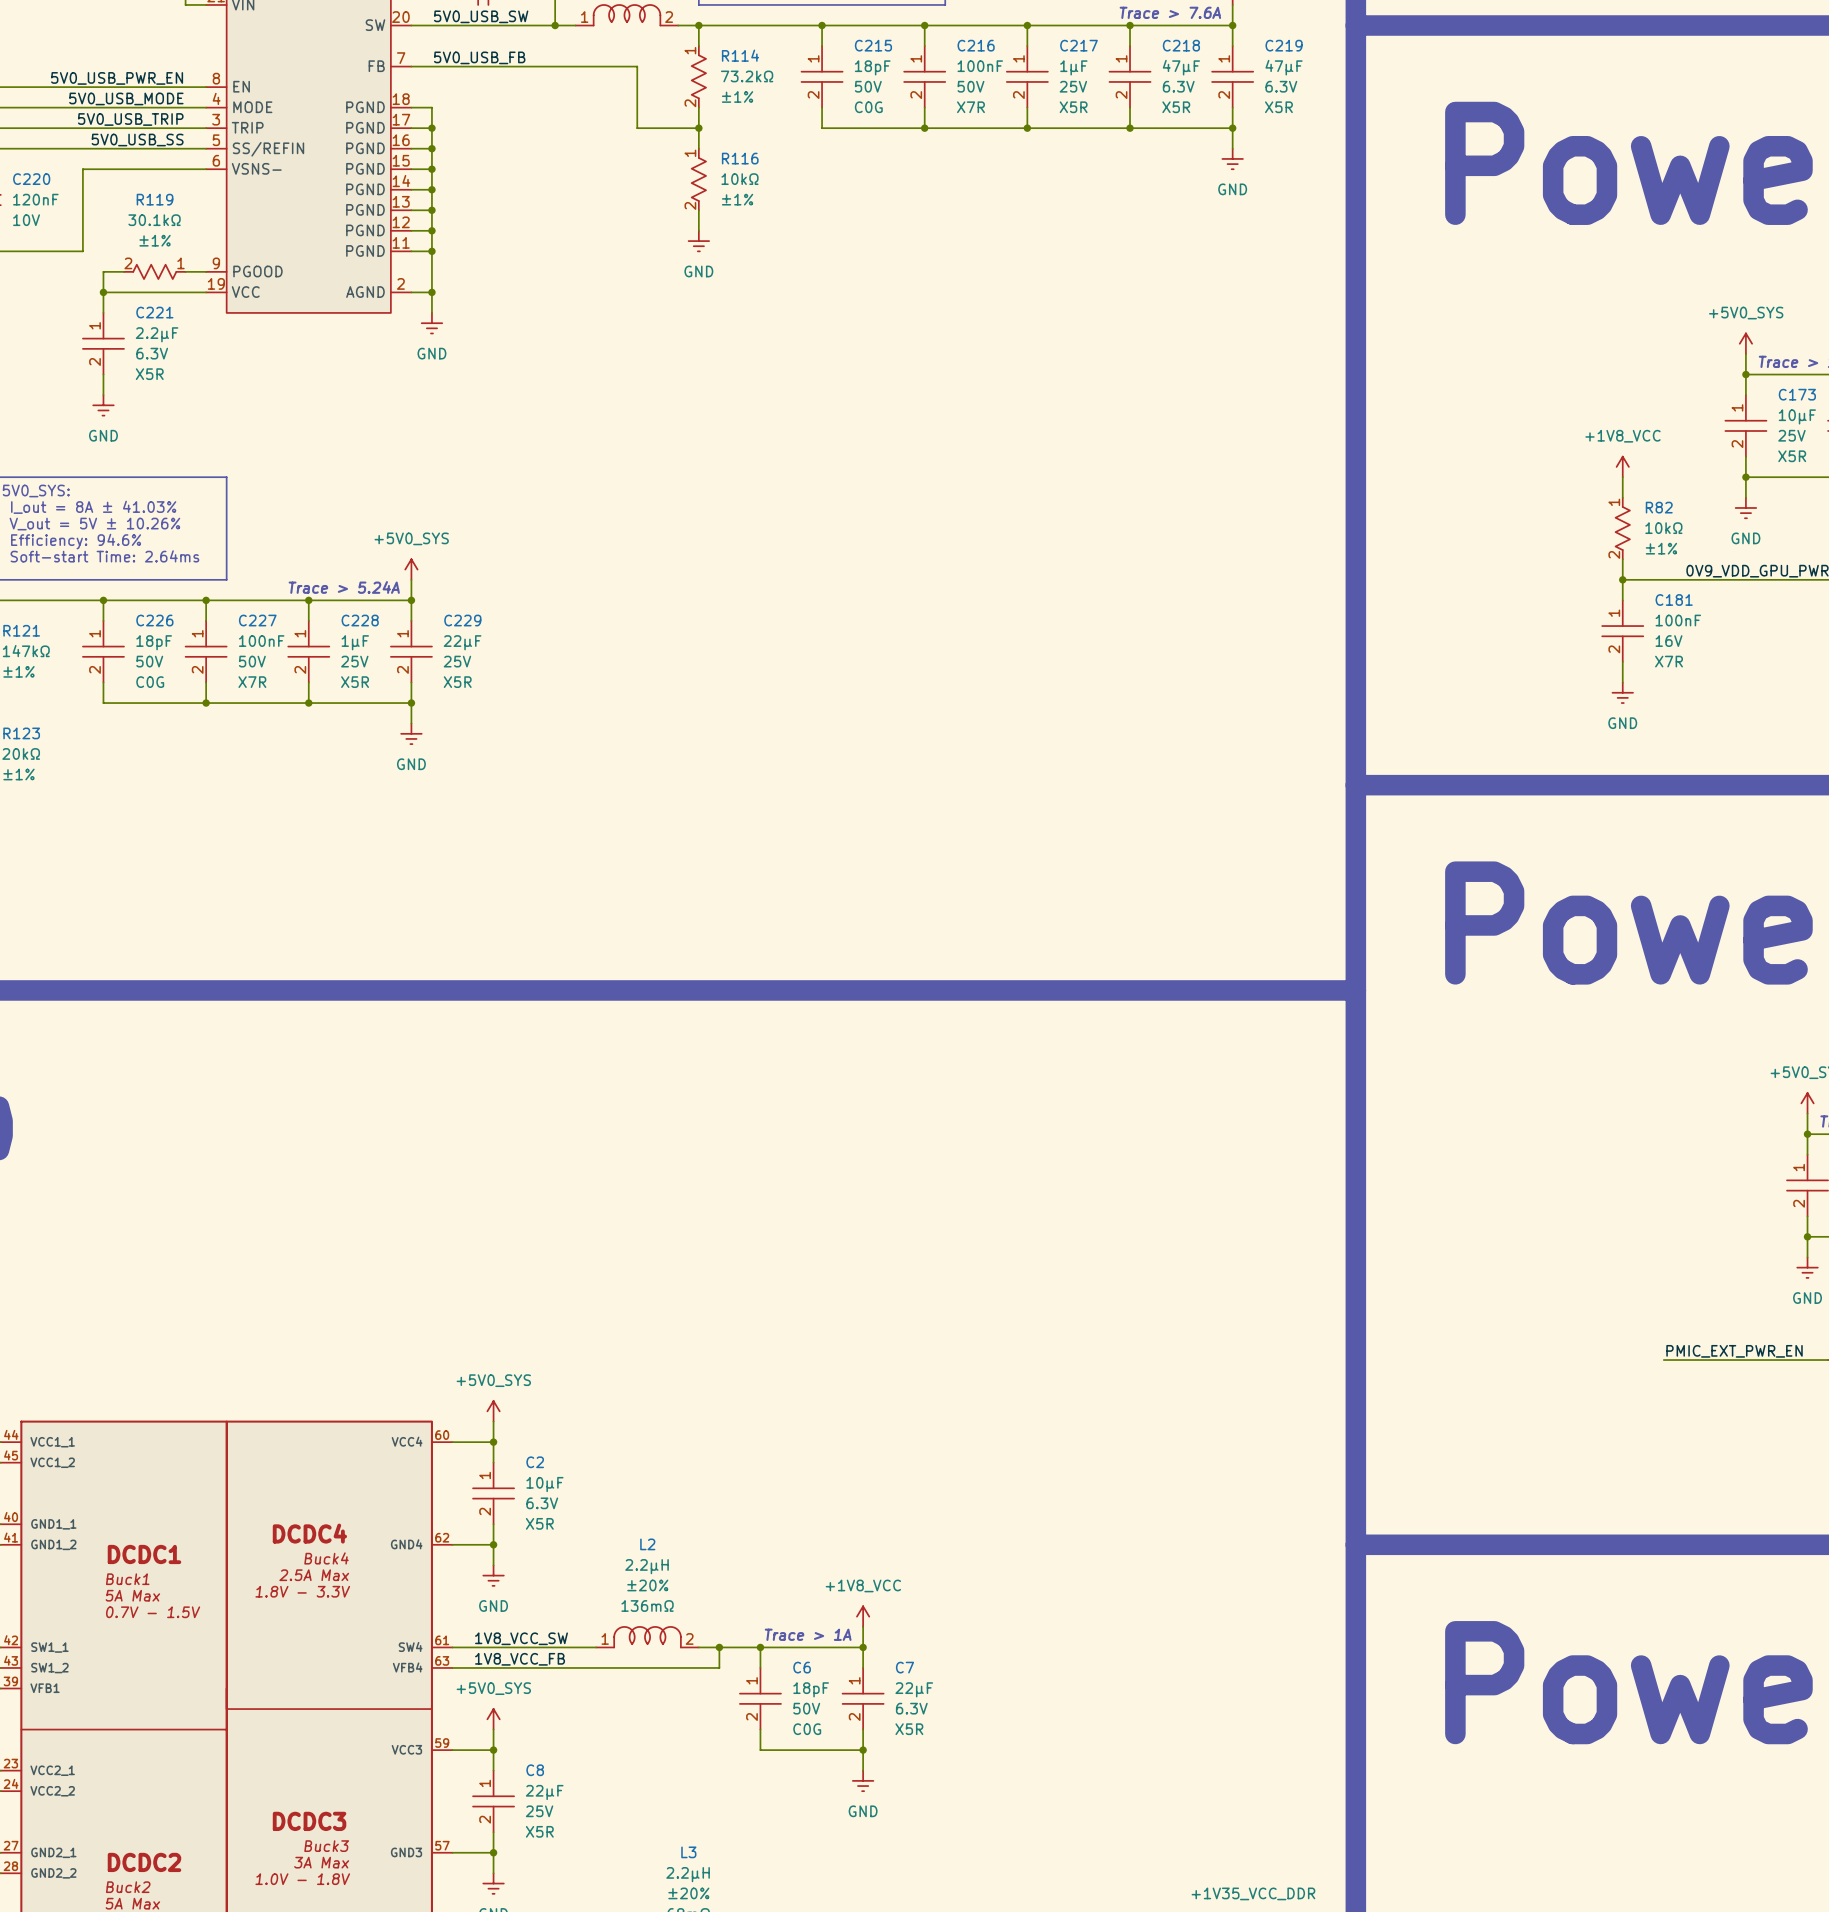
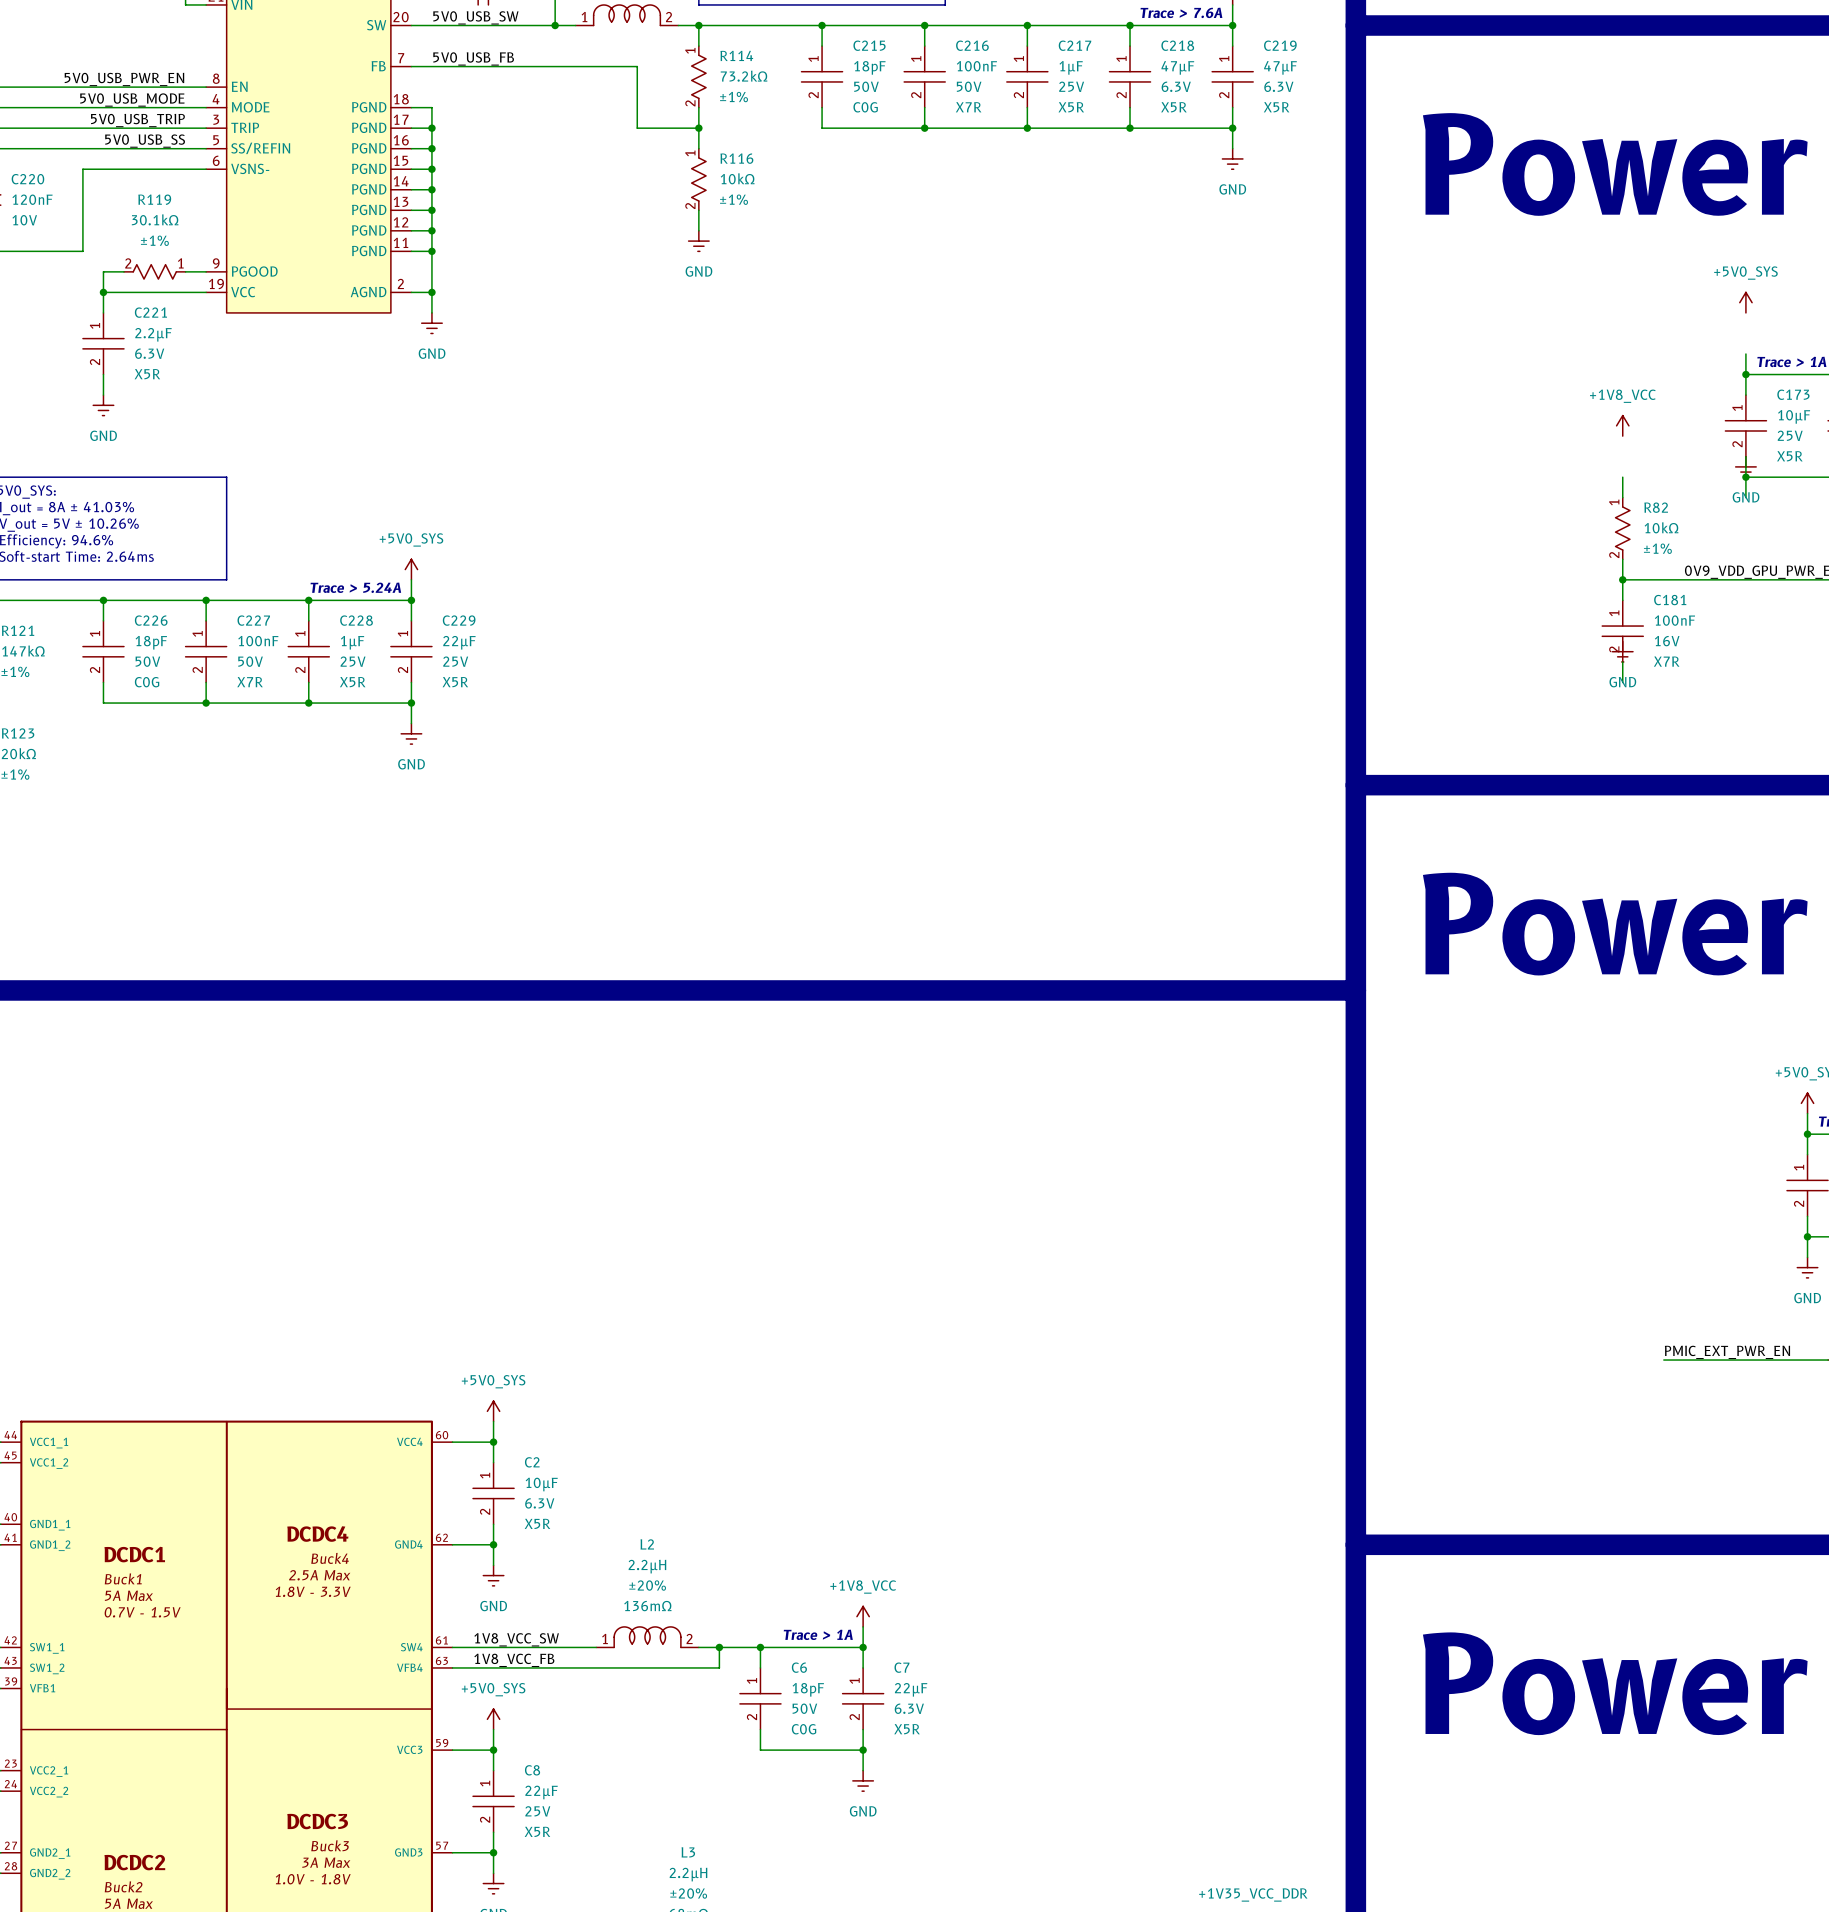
power symbol position: +5V0_SYS (1745, 343) -> +5V0_SYS (1745, 302)
power symbol position: +1V8_VCC (1622, 466) -> +1V8_VCC (1622, 425)
power symbol position: GND (1745, 507) -> GND (1745, 466)
power symbol position: GND (1622, 692) -> GND (1622, 651)

